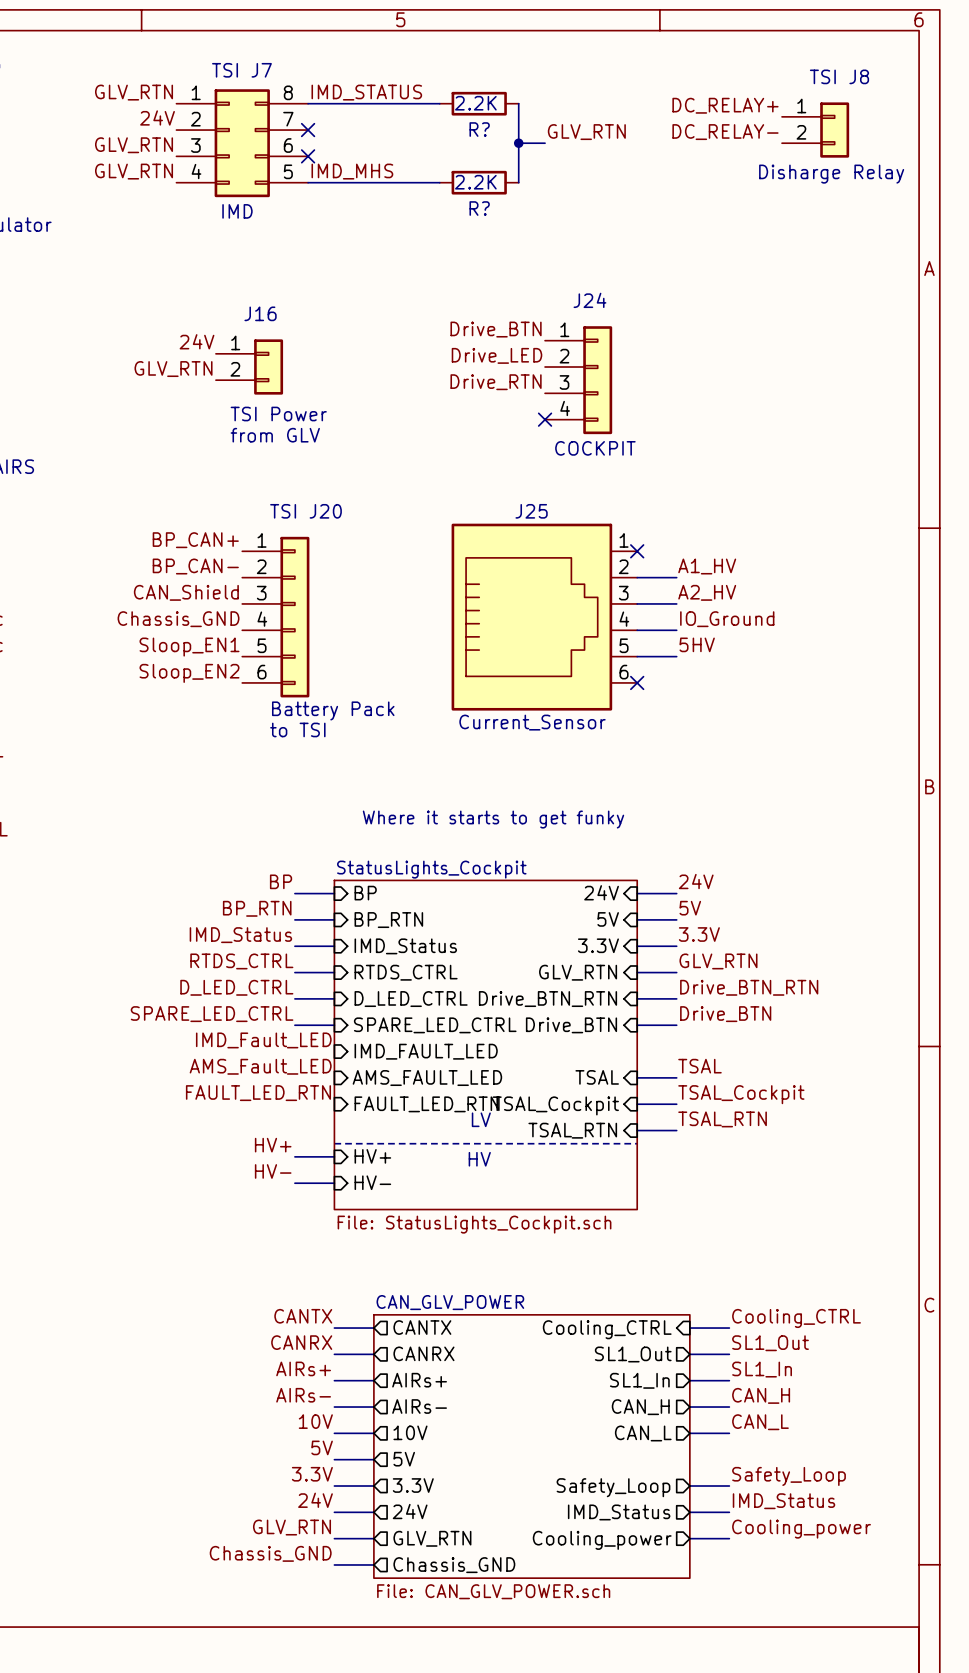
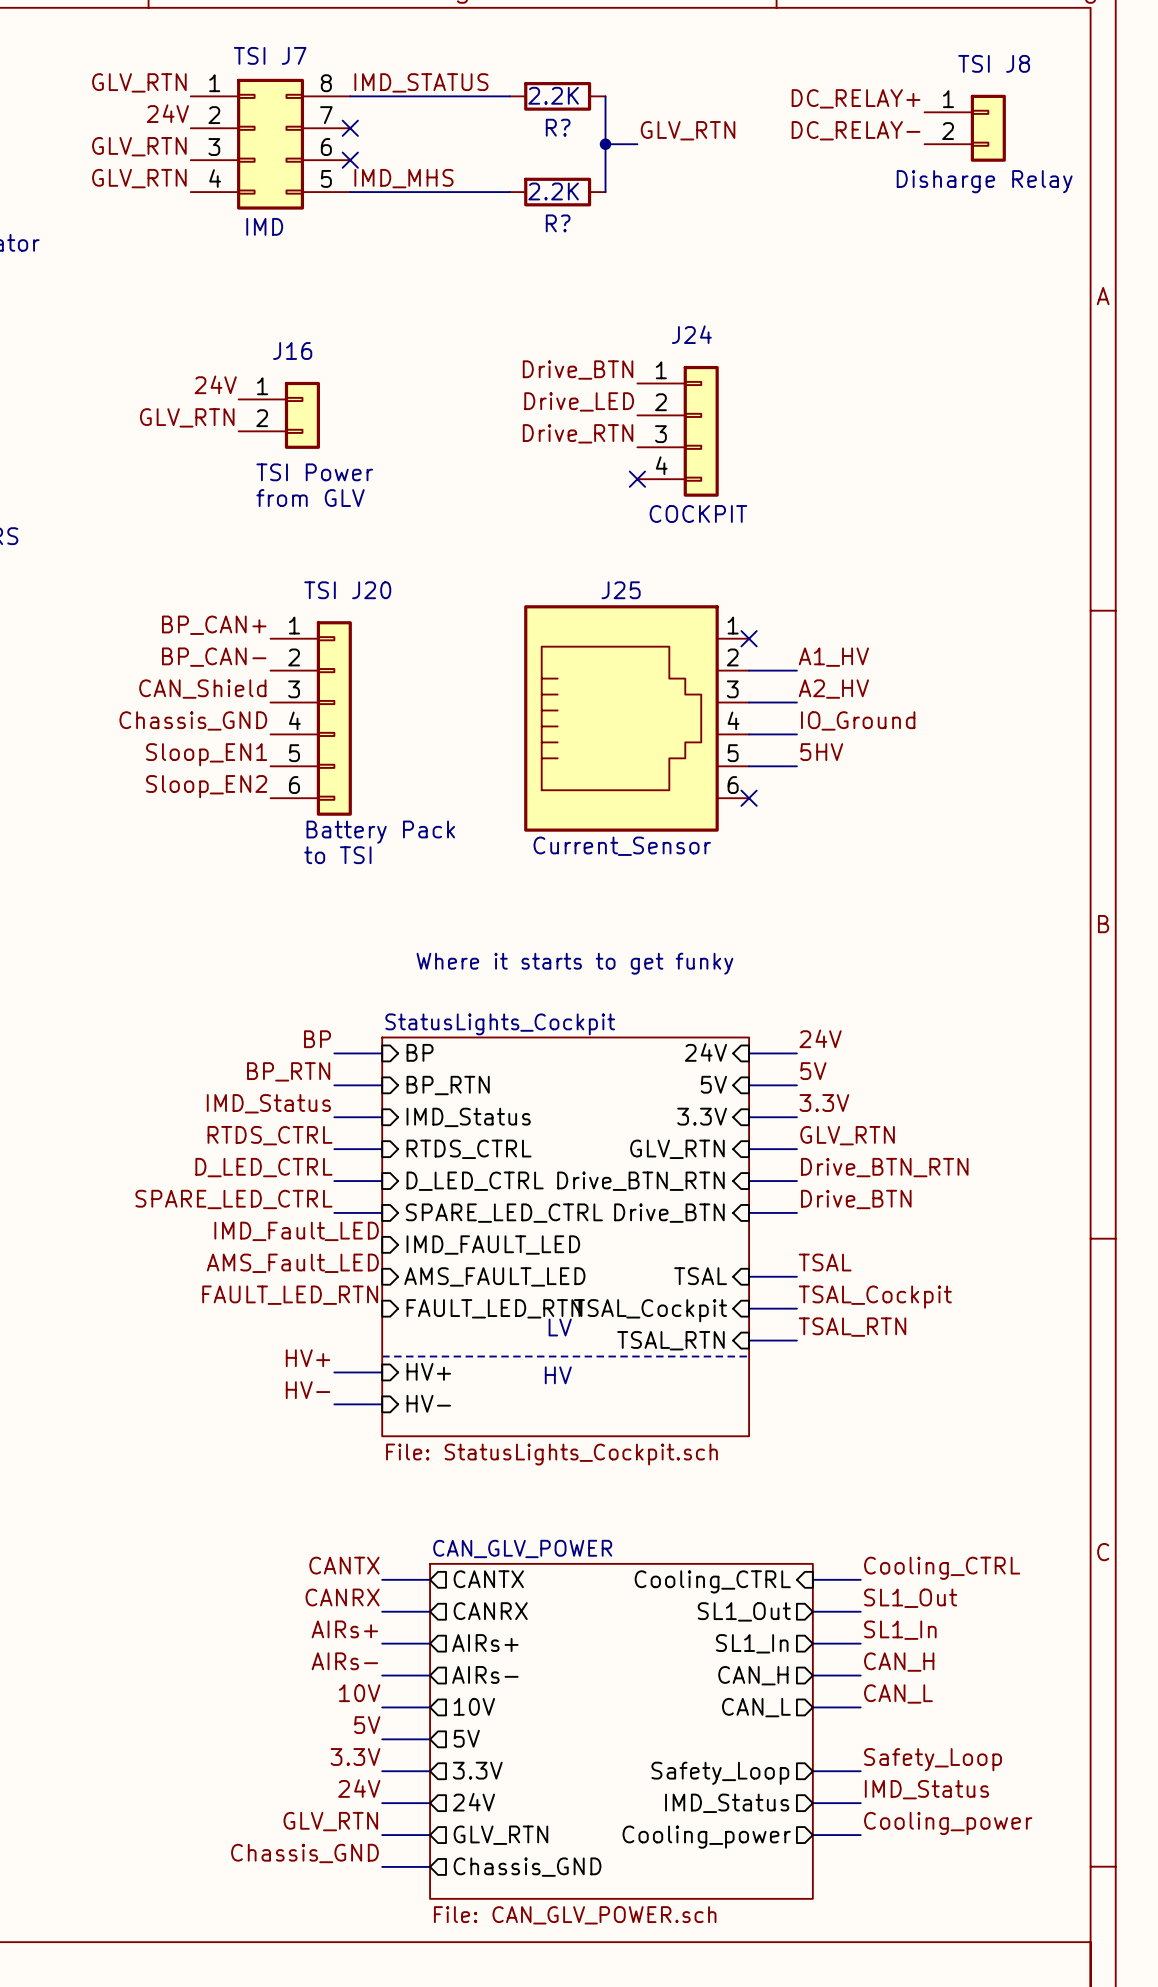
sheet CAN_GLV_POWER shape: [373, 1314, 690, 1579] -> [430, 1563, 813, 1899]

